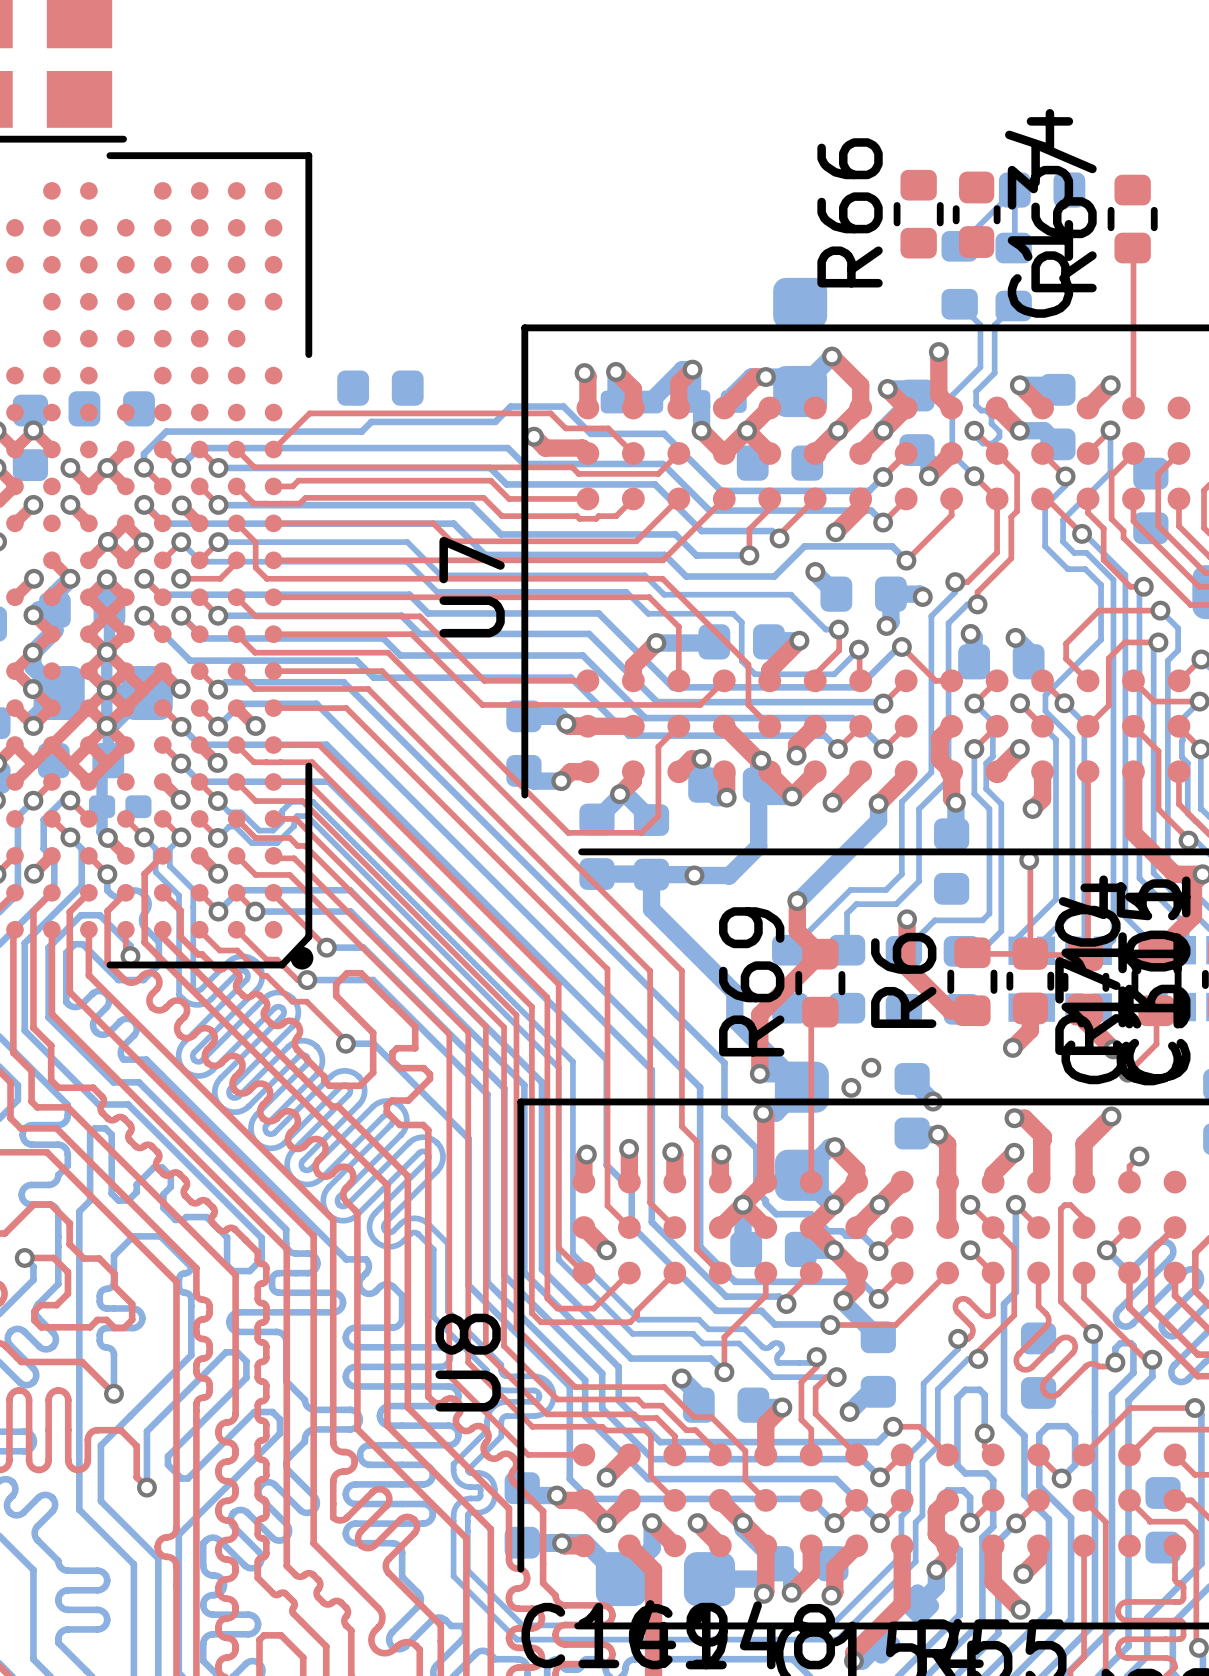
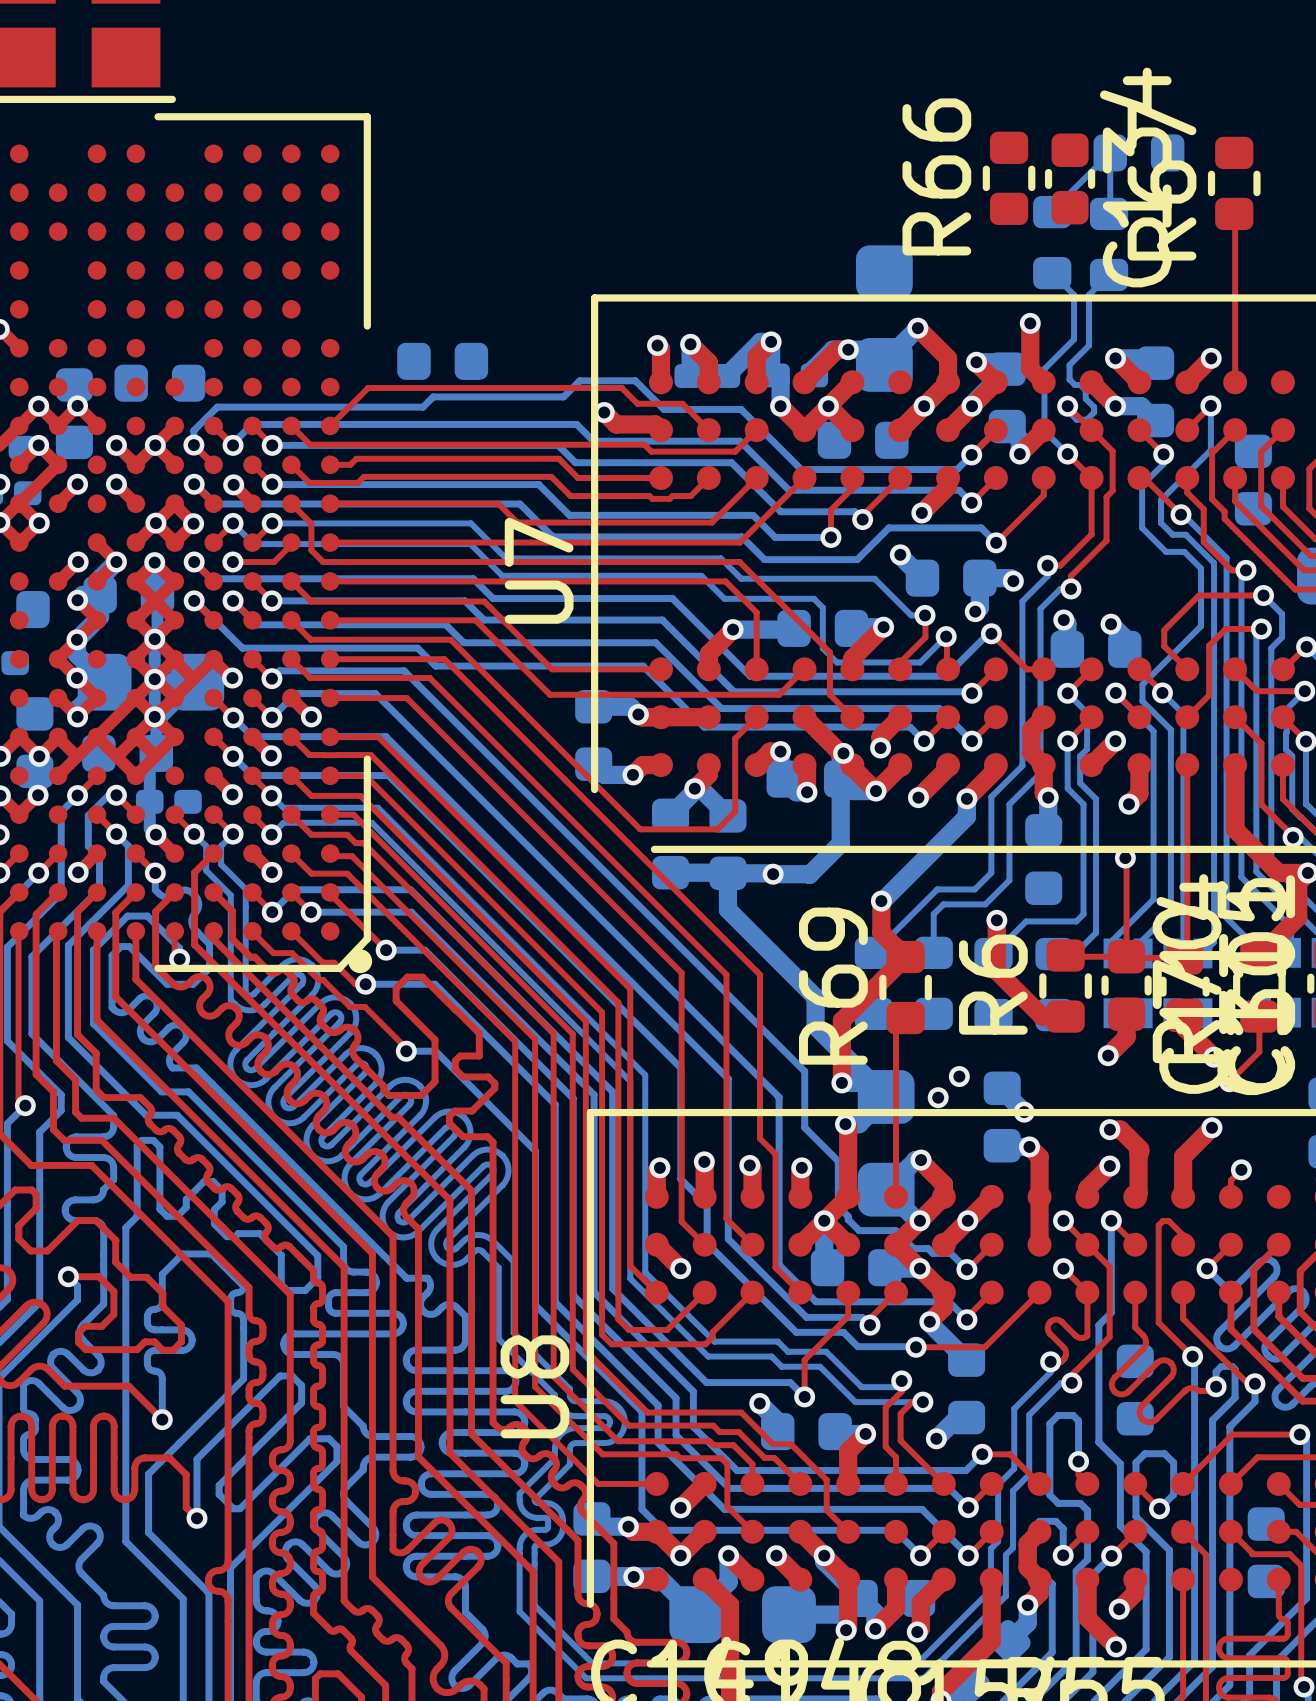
bottom track: (241, 812) (259, 830) (273, 830) (282, 821) (282, 810) (291, 801) (313, 801) (572, 1061) (572, 1066) -> (296, 807) (378, 807) (645, 1075)
bottom track: (235, 826) (251, 843) (277, 843) (294, 826) (294, 819) (297, 816) (307, 816) (558, 1067) (558, 1072) -> (289, 822) (371, 822) (630, 1081)
bottom track: (762, 1346) (767, 1348) (775, 1342) (780, 1344) (782, 1349) (776, 1358) (778, 1362) -> (844, 1369) (861, 1387)

